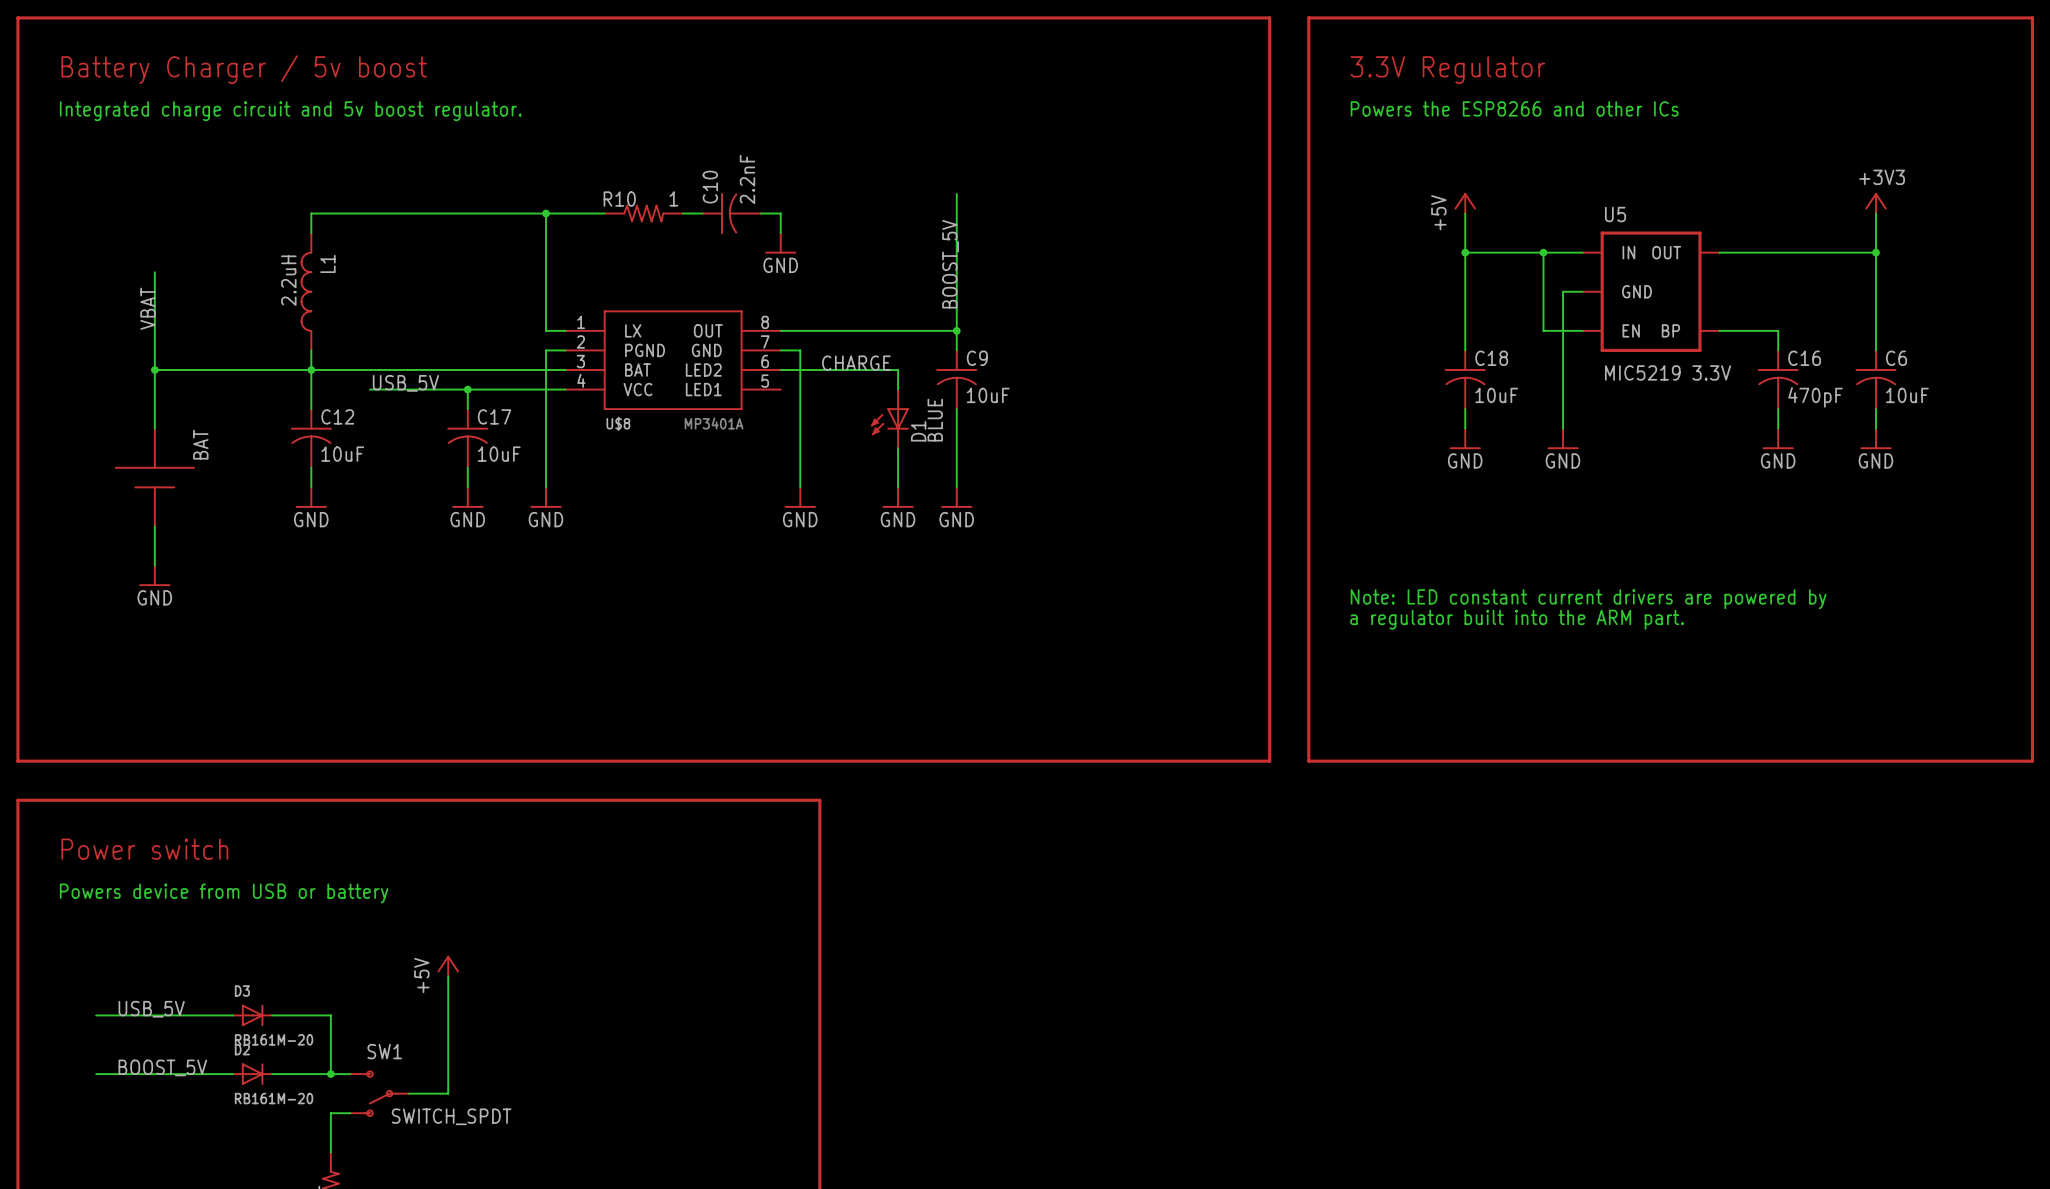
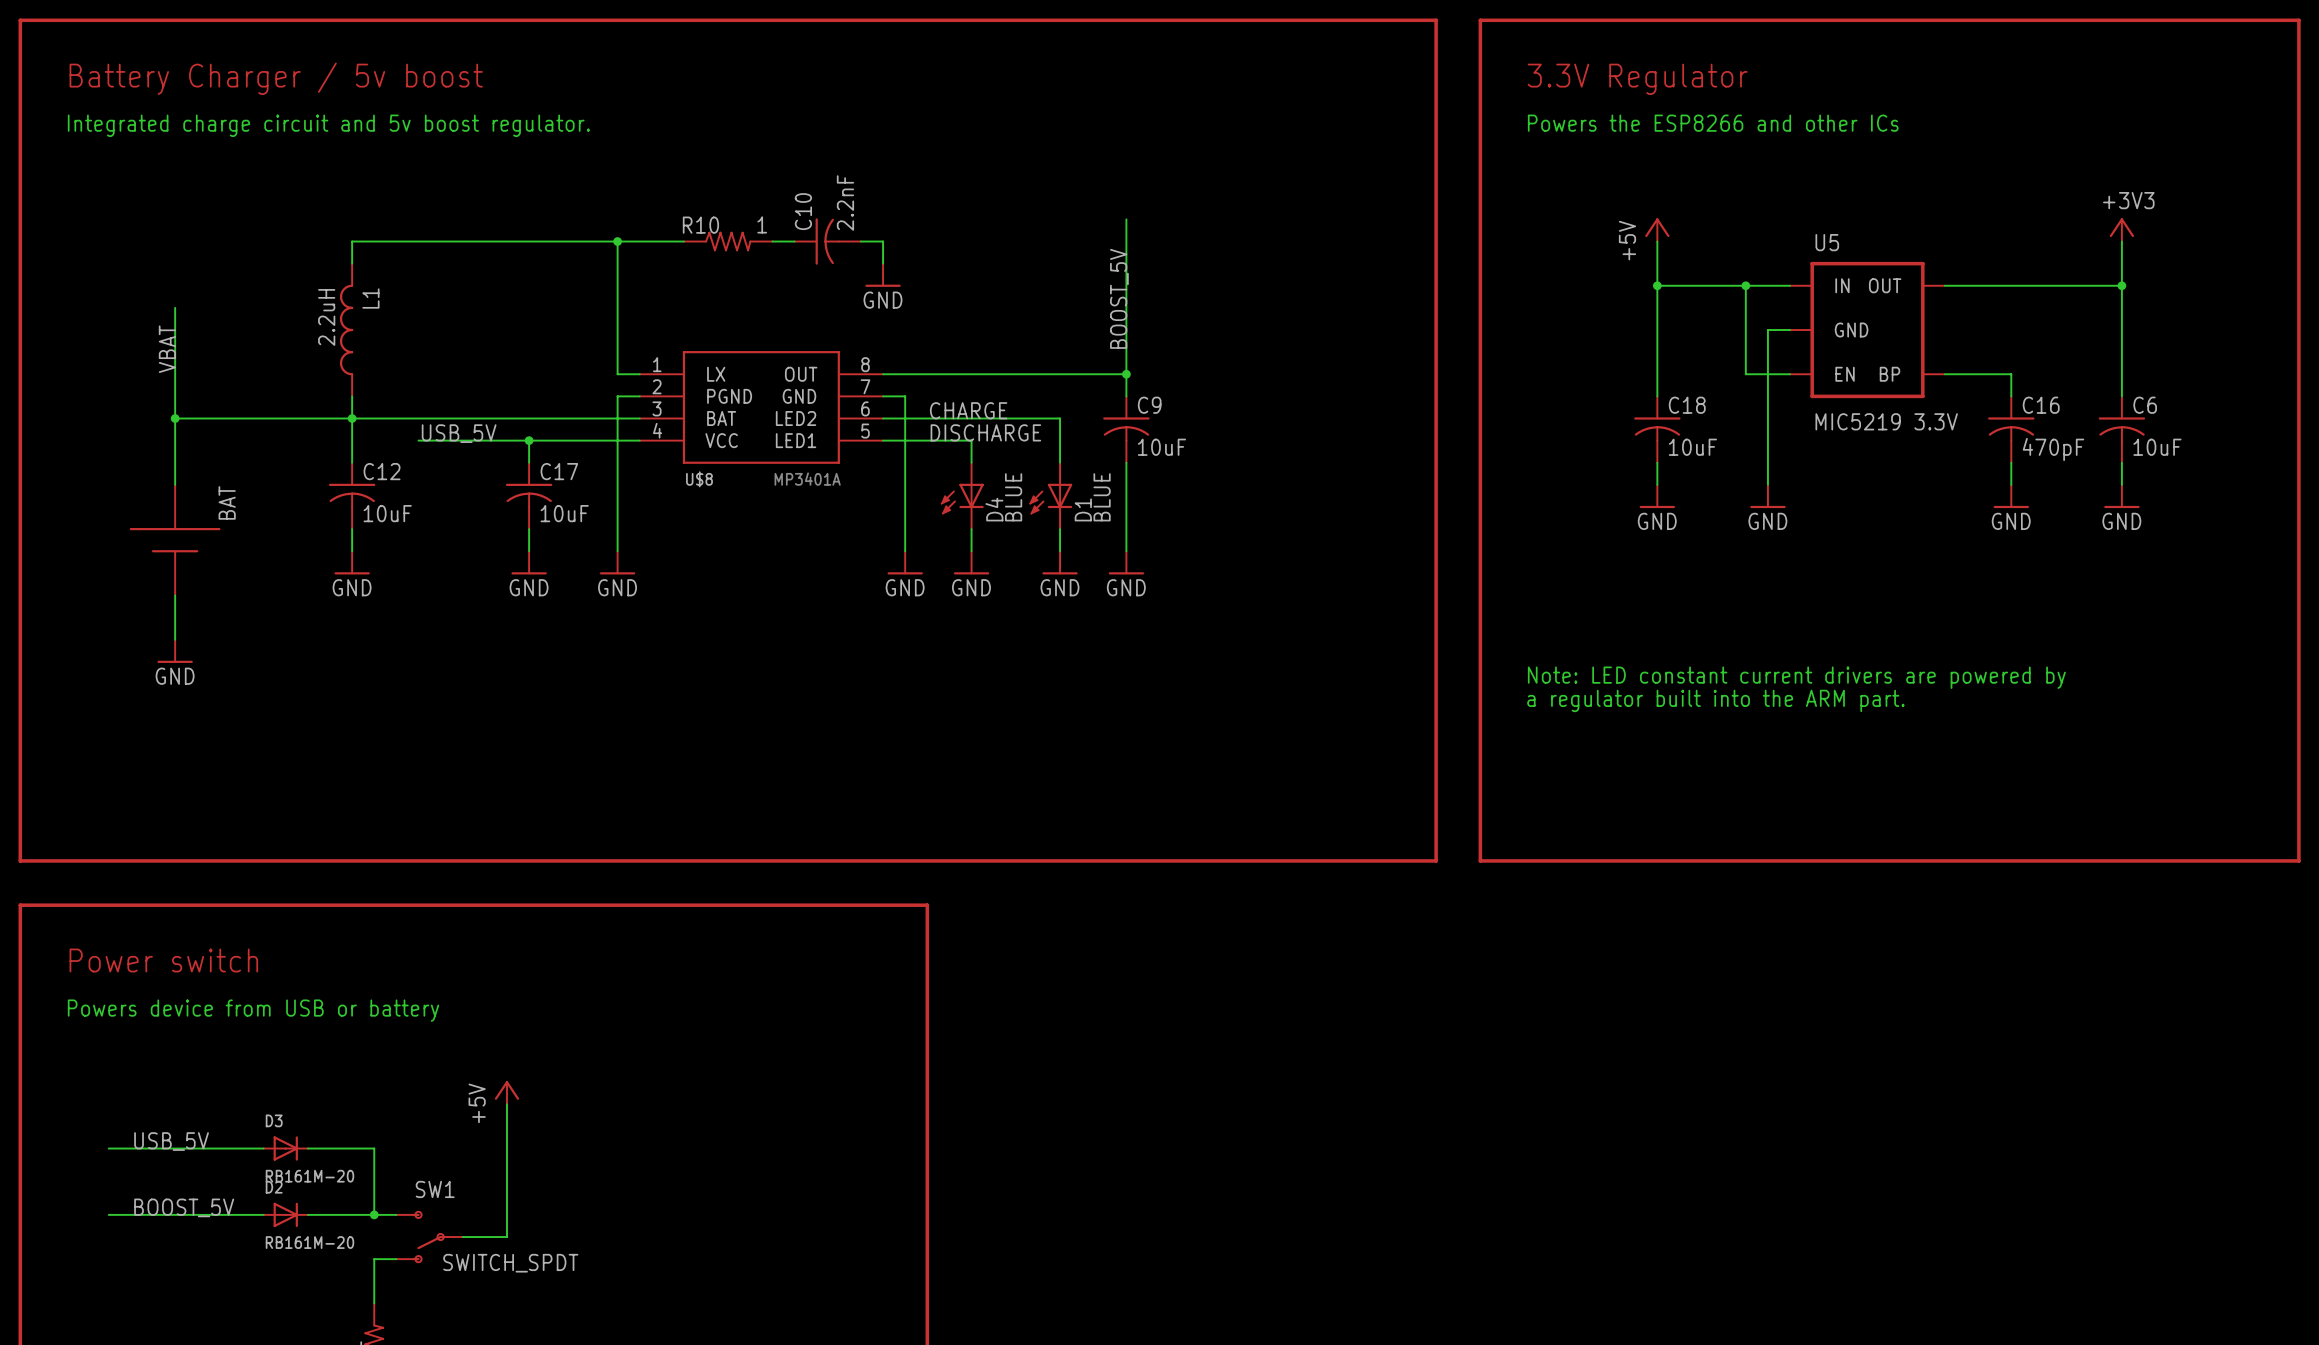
wire: (956, 193) (956, 350) -> (1126, 219) (1126, 396)
label position: BOOST_5V (950, 264) -> BOOST_5V (1119, 298)
wire: none -> (1082, 374) (1126, 374)
junction position: (956, 330) -> (1126, 374)
wire: (898, 370) (898, 389) -> (1015, 418) (1060, 418) (1060, 462)
C9 position: (956, 379) -> (1126, 429)
label: none -> DISCHARGE (985, 432)
wire: none -> (883, 440) (971, 440) (971, 462)
wire: (956, 409) (956, 487) -> (1126, 462) (1126, 551)
D1 position: (889, 418) -> (1050, 495)
D4: none -> BLUE (962, 495)
wire: (898, 448) (898, 487) -> none
wire: none -> (971, 529) (971, 551)
wire: none -> (1060, 529) (1060, 551)
power symbol: none -> GND (971, 562)
power symbol: GND (898, 497) -> none
power symbol: none -> GND (1060, 562)
power symbol: GND (956, 497) -> none
power symbol: none -> GND (1126, 562)

